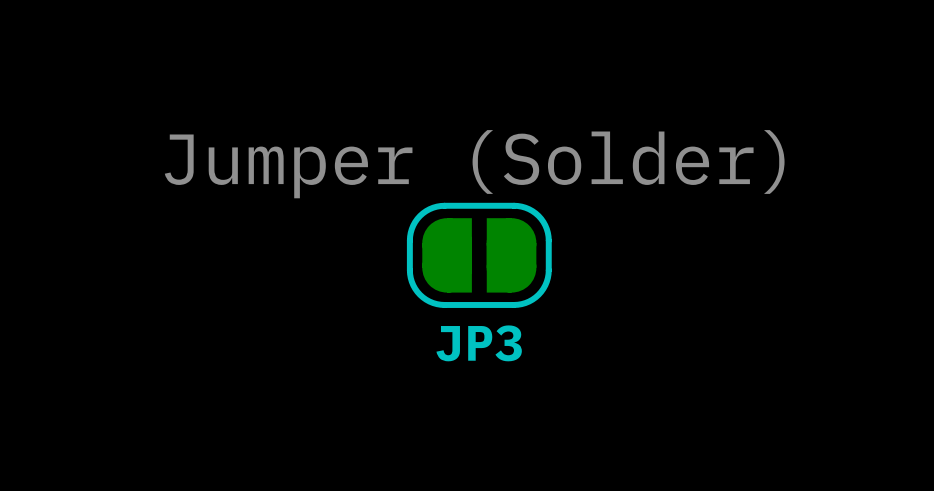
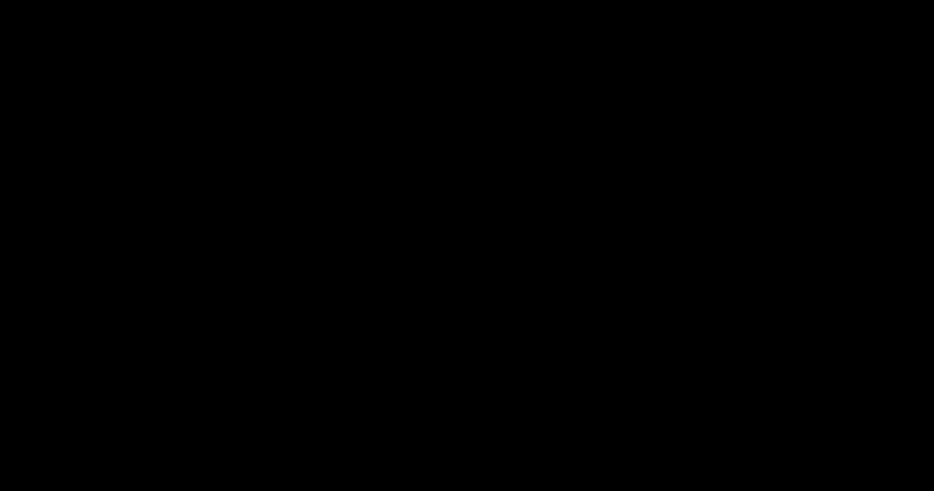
JP3: Jumper (Solder) (479, 255) -> none

